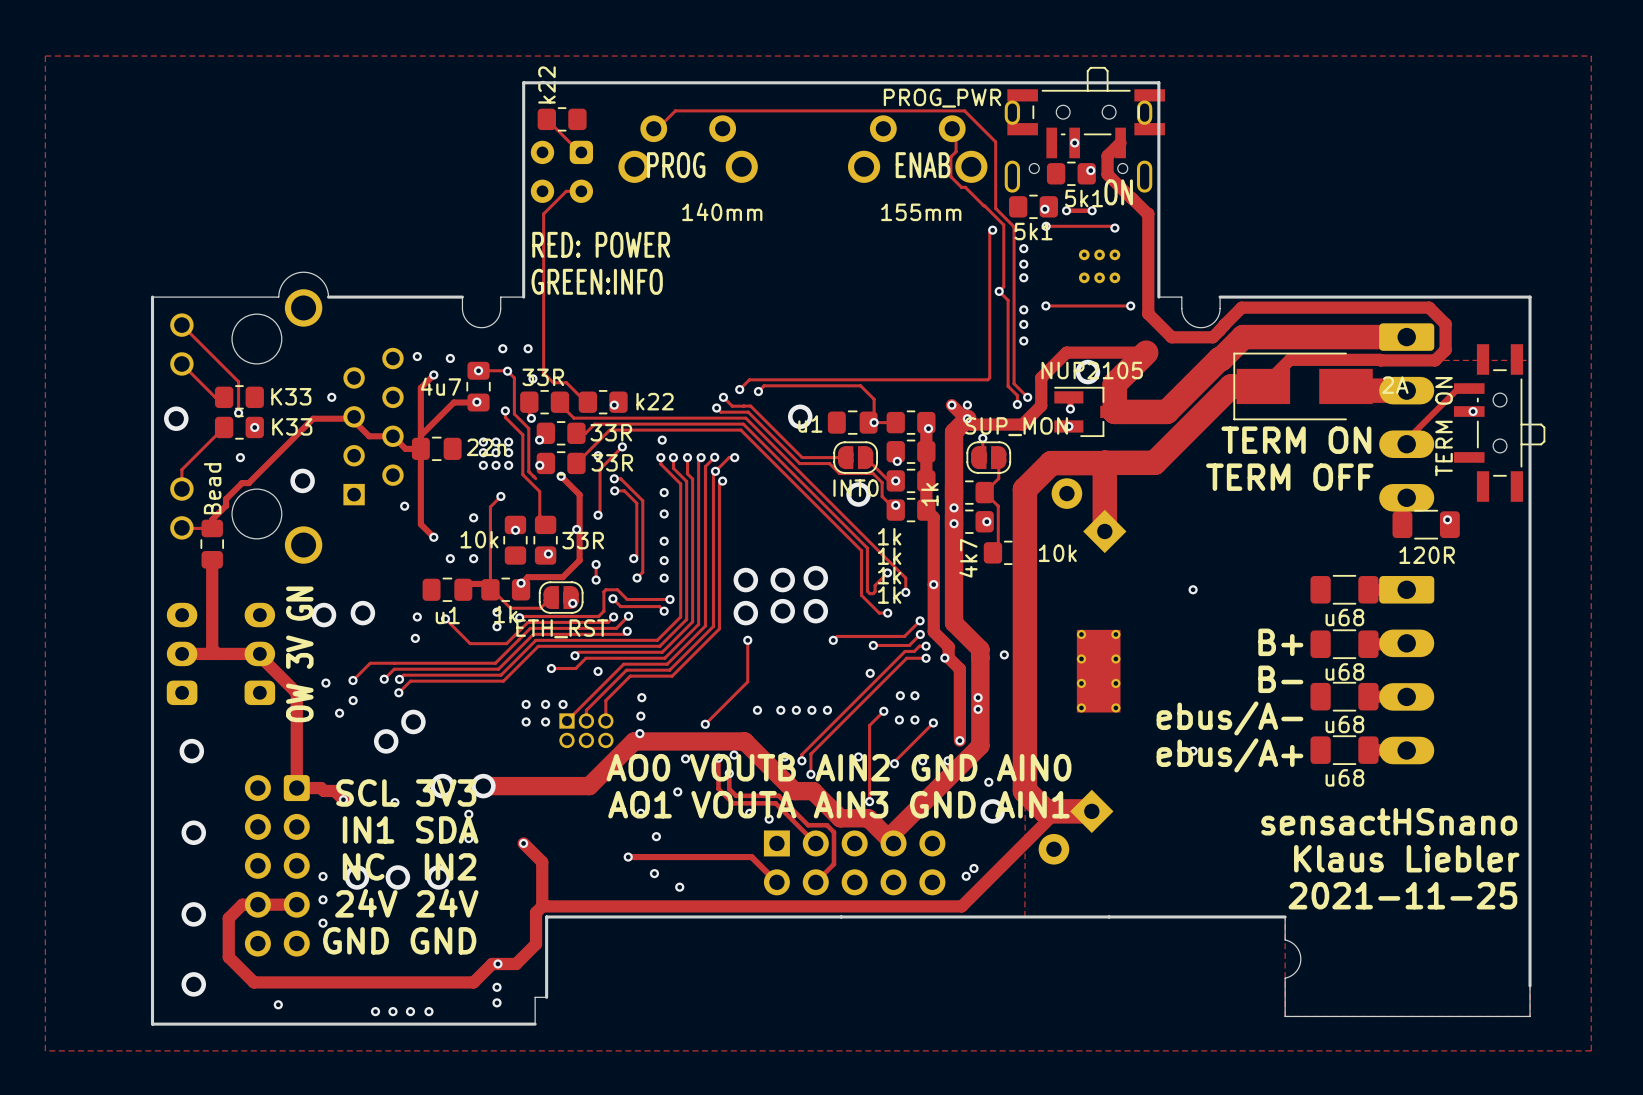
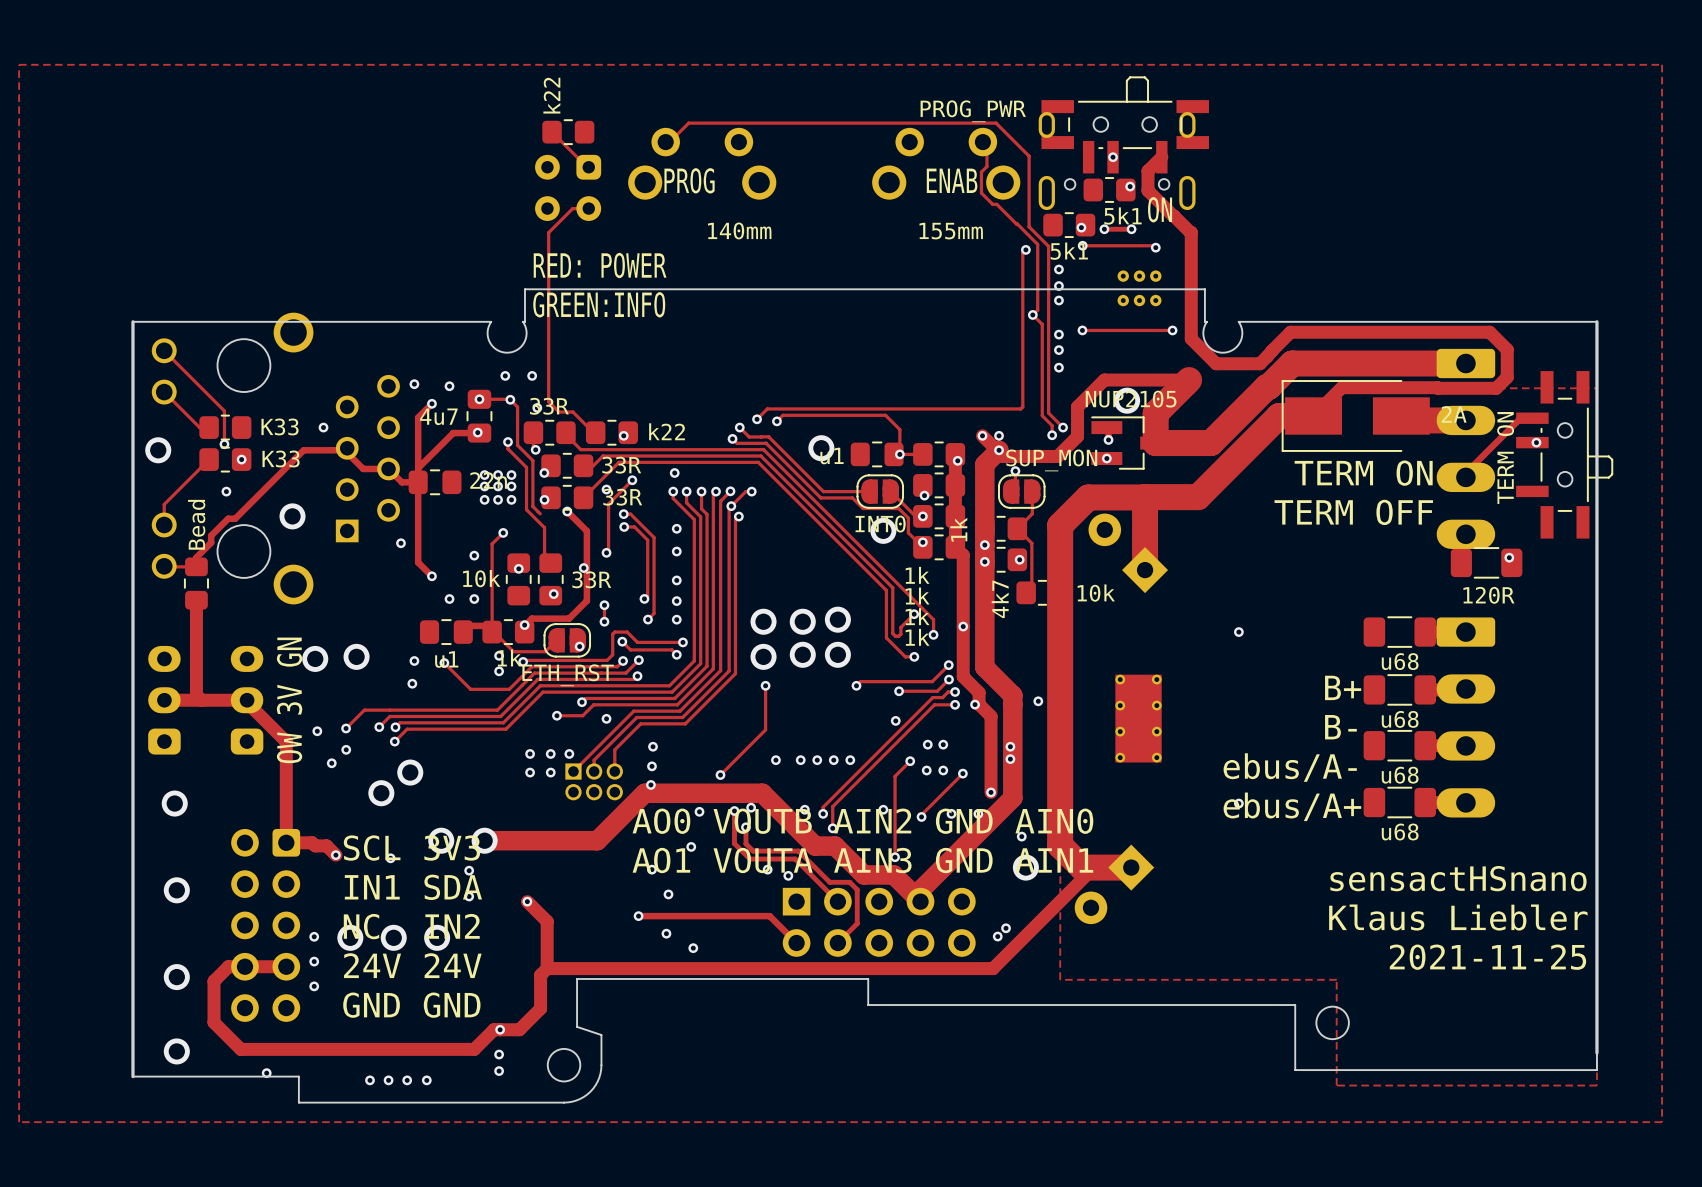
board edge: (152, 297) (278, 297) (280, 288) (287, 278) (297, 272) (306, 272) (315, 275) (322, 280) (326, 288) (328, 297) (462, 297) (463, 313) (468, 322) (479, 327) (491, 325) (499, 315) (500, 297) (523, 297) (523, 82) (1158, 82) (1158, 297) (1181, 297) (1183, 315) (1191, 325) (1203, 327) (1214, 322) (1219, 313) (1220, 297) (1530, 297) -> (132, 321) (491, 321) (487, 331) (490, 343) (497, 350) (509, 352) (518, 348) (525, 338) (526, 331) (522, 321) (525, 321) (525, 289) (1204, 289) (1204, 321) (1206, 321) (1203, 328) (1204, 338) (1211, 348) (1222, 352) (1232, 350) (1239, 343) (1242, 333) (1238, 321) (1596, 321)
round board edge: none -> [1315, 1005, 1350, 1040]
round board edge: none -> [546, 1048, 582, 1083]
board edge: (1530, 1001) (1530, 1016) (1285, 1016) (1285, 978) (1297, 970) (1300, 959) (1295, 945) (1285, 939) (1285, 916) (546, 916) (546, 997) (535, 997) (535, 1024) (152, 1024) (152, 1008) -> (1596, 1070) (1295, 1070) (1295, 1005) (868, 1005) (868, 978) (577, 978) (577, 1026) (601, 1035) (601, 1065) (599, 1077) (593, 1088) (583, 1096) (572, 1101) (298, 1102) (298, 1076) (132, 1076)

